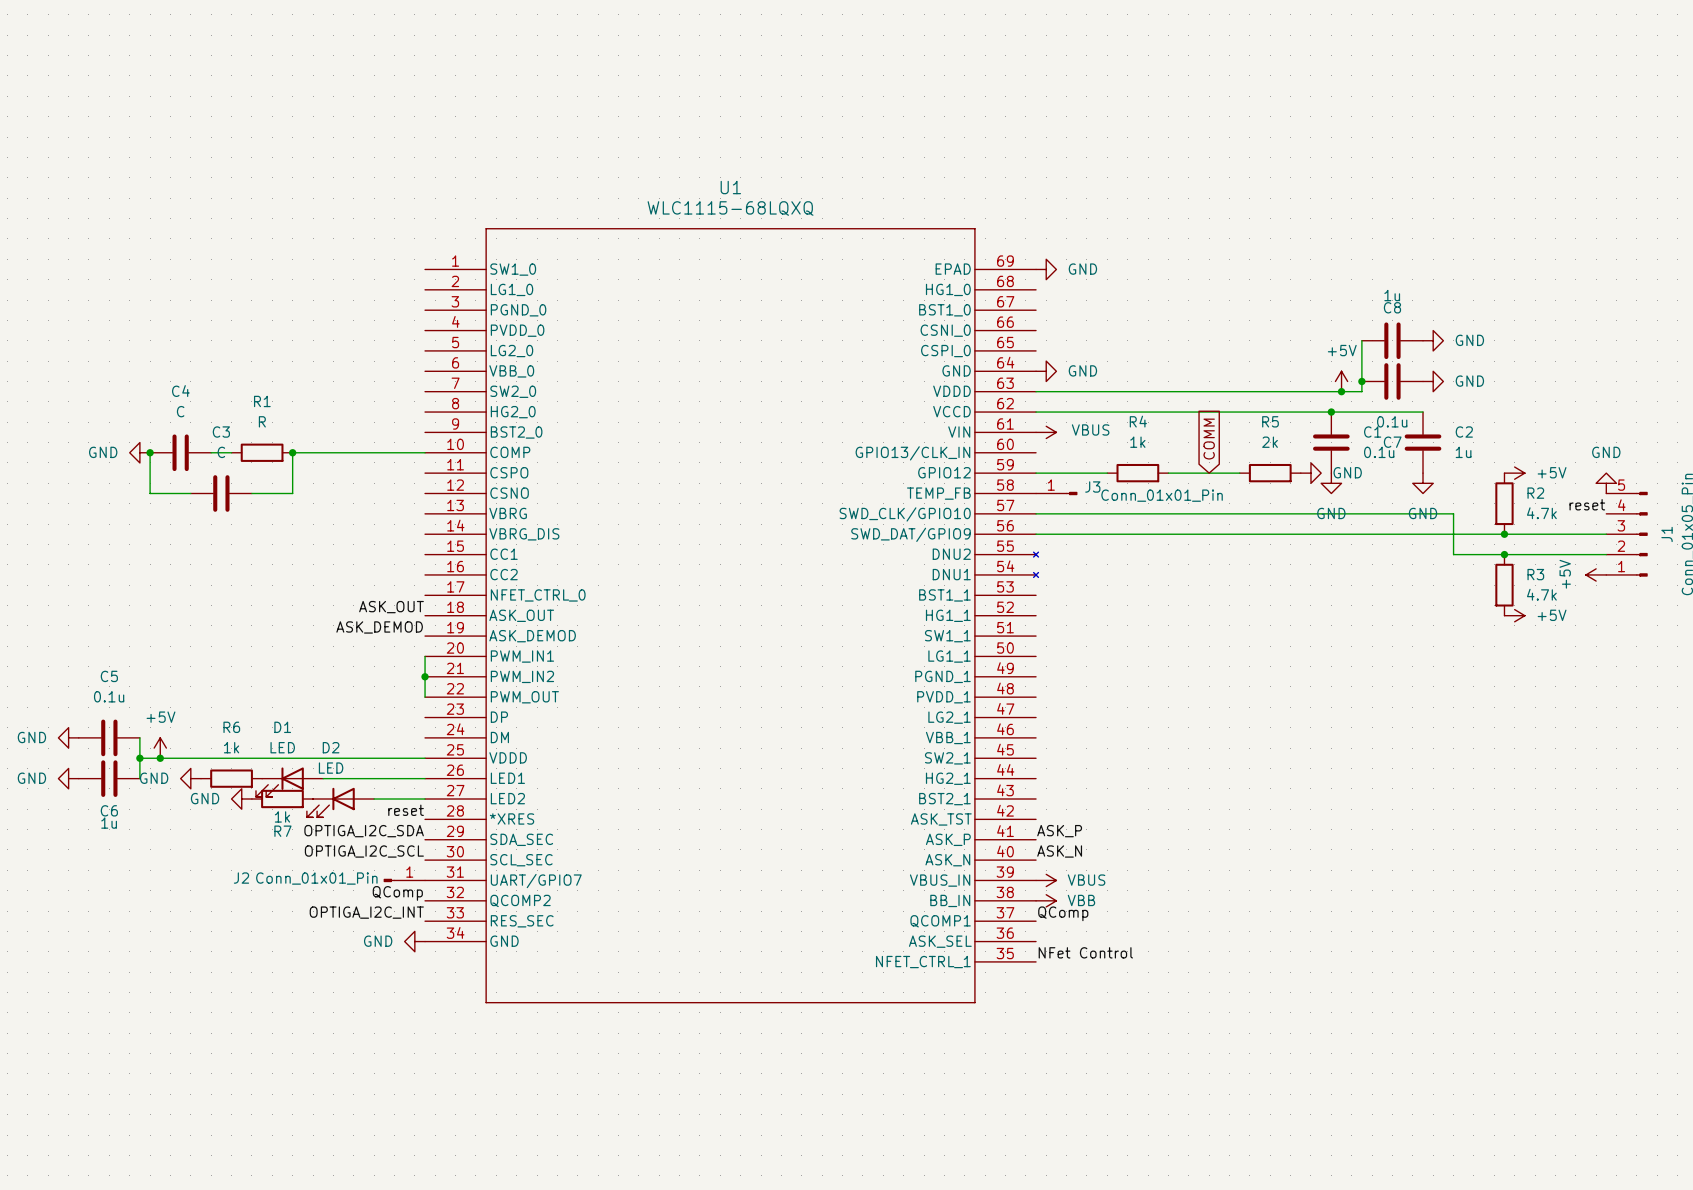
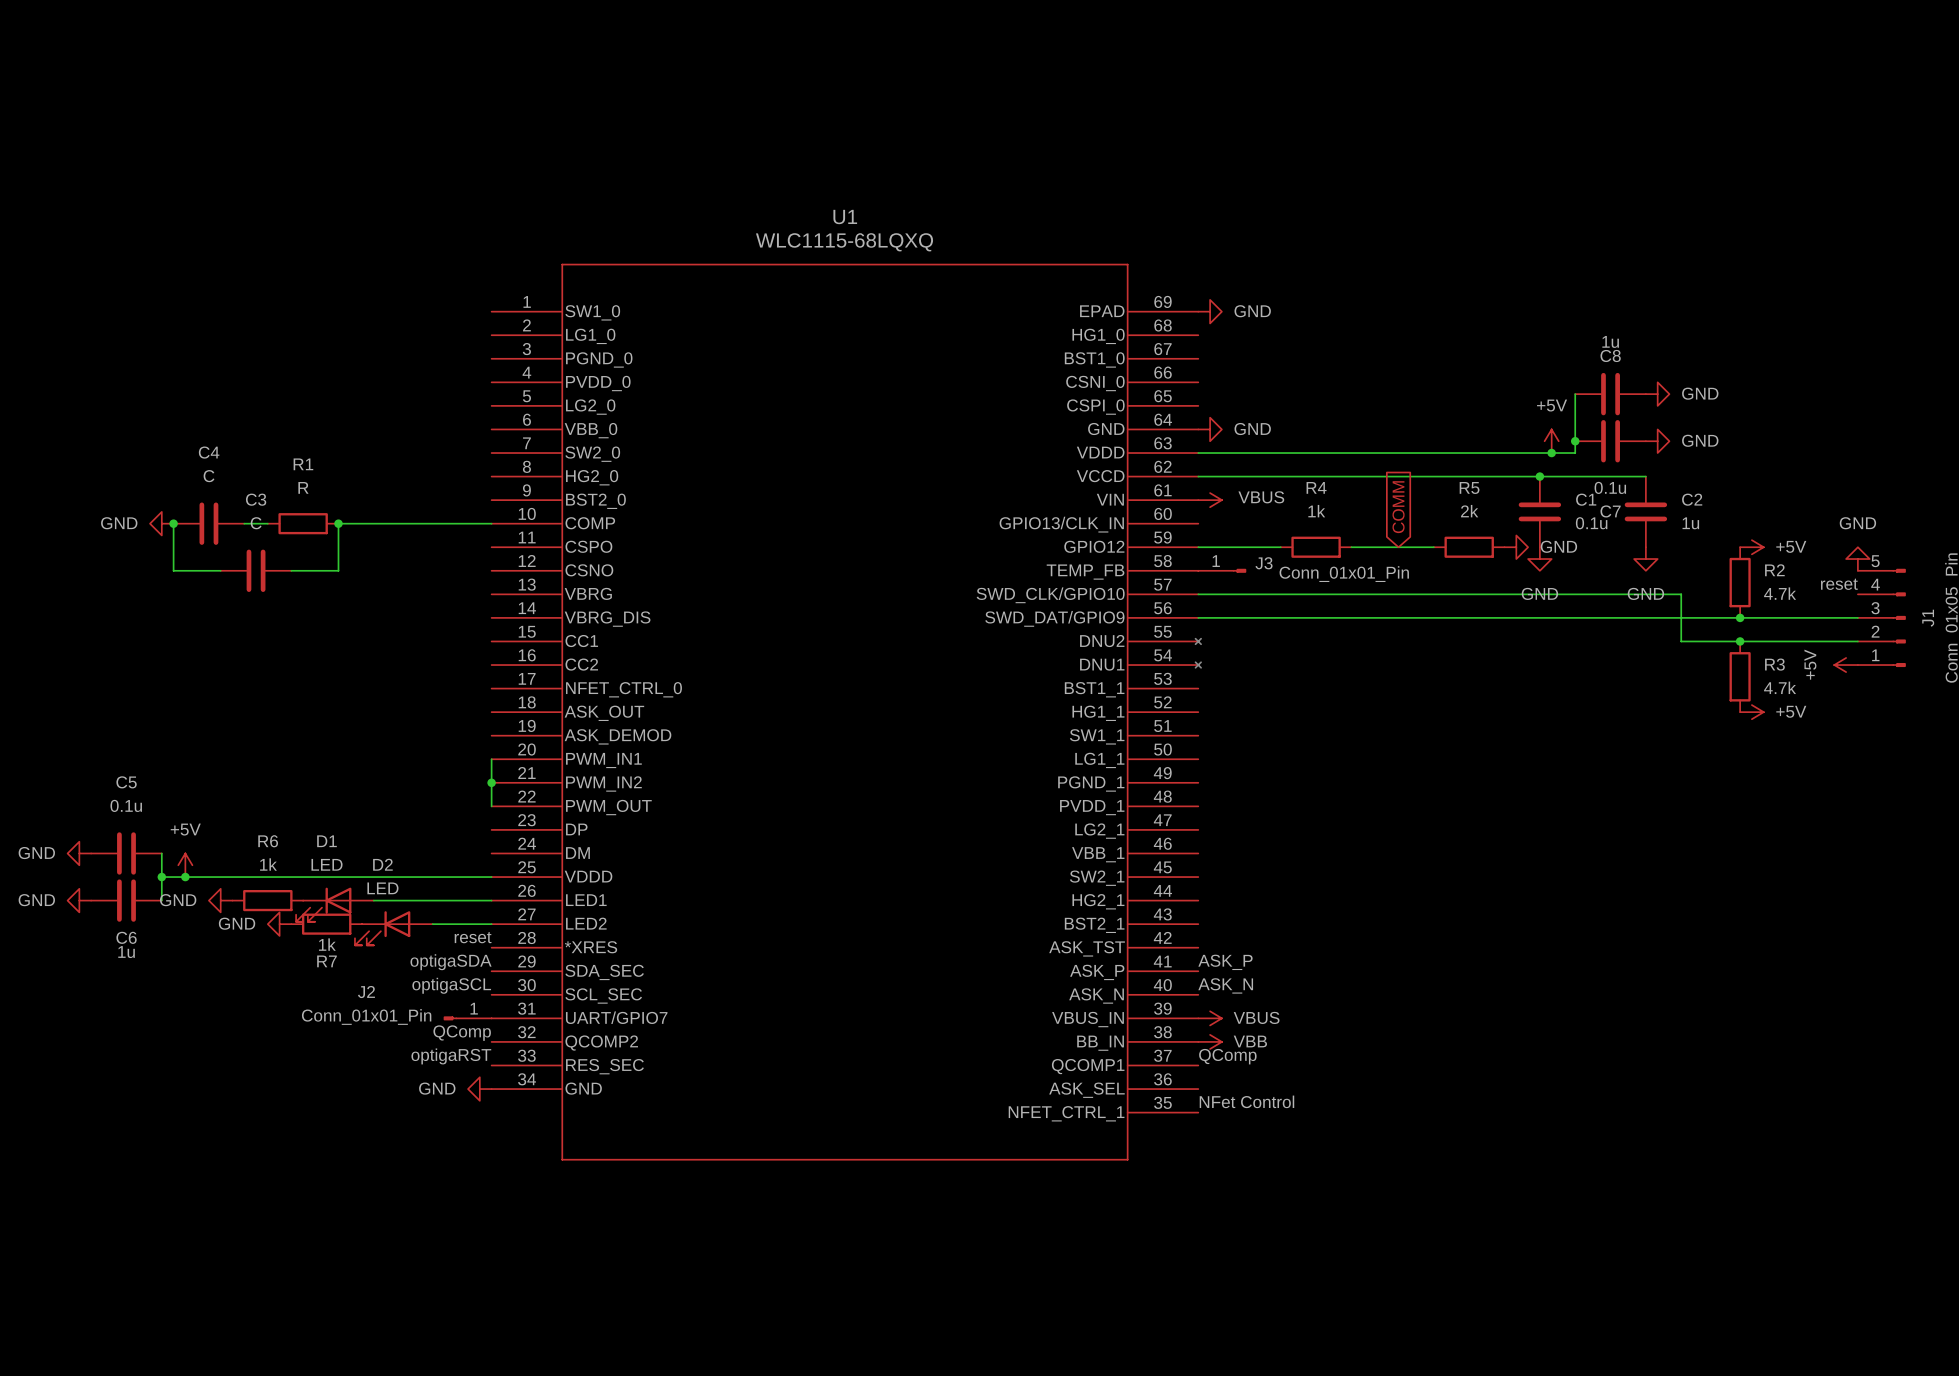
label: ASK_OUT (391, 607) -> none
label: ASK_DEMOD (379, 627) -> none
label: OPTIGA_I2C_SDA (364, 831) -> optigaSDA (451, 962)
label: OPTIGA_I2C_SCL (364, 851) -> optigaSCL (451, 985)
J2 name position: J2 (241, 878) -> J2 (366, 992)
label: OPTIGA_I2C_INT (366, 912) -> optigaRST (451, 1056)

